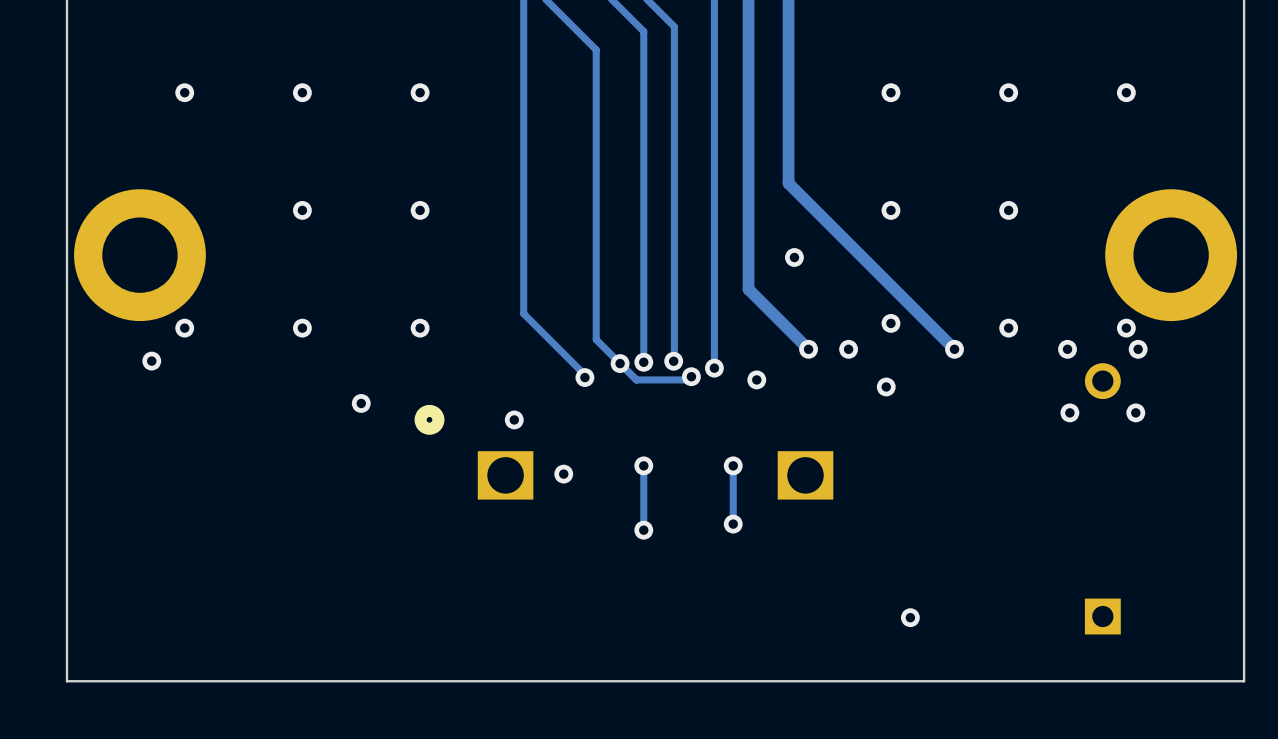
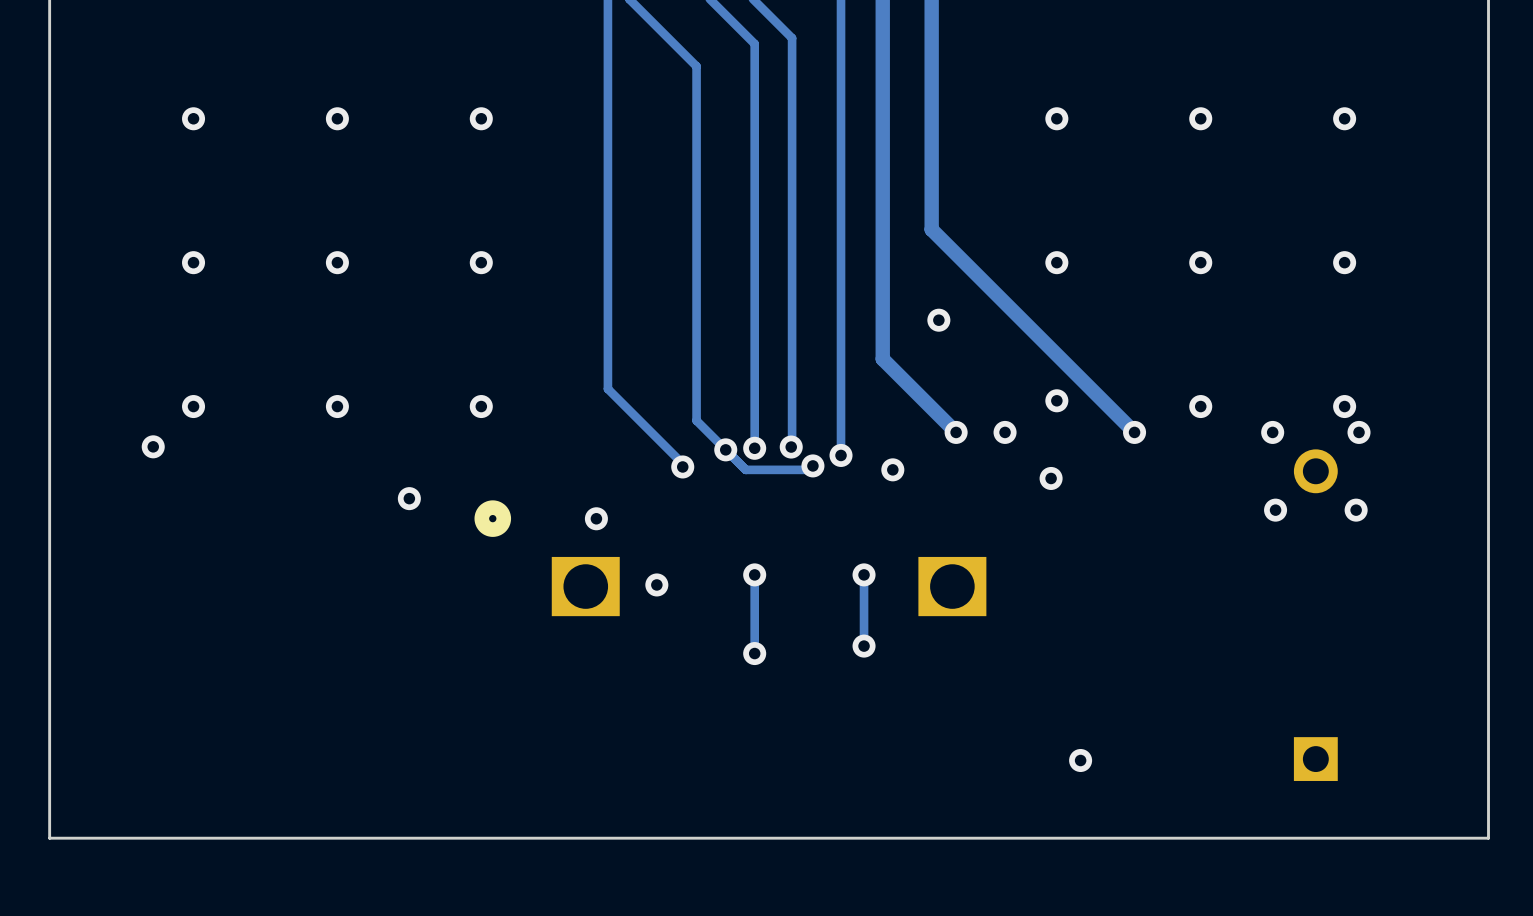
via: none -> (193, 262)
via: none -> (1344, 262)
part: (139, 255) -> none
part: (1171, 255) -> none

